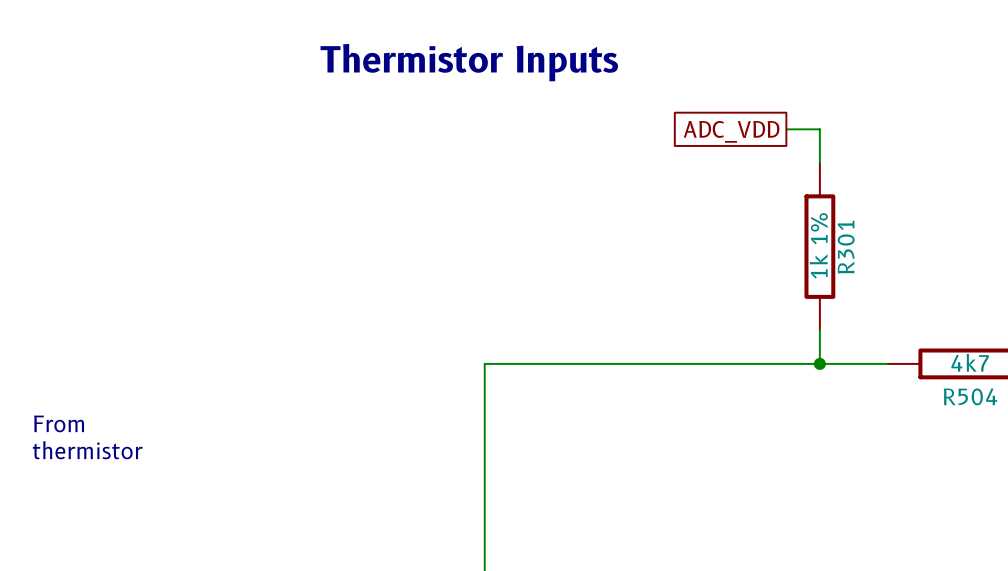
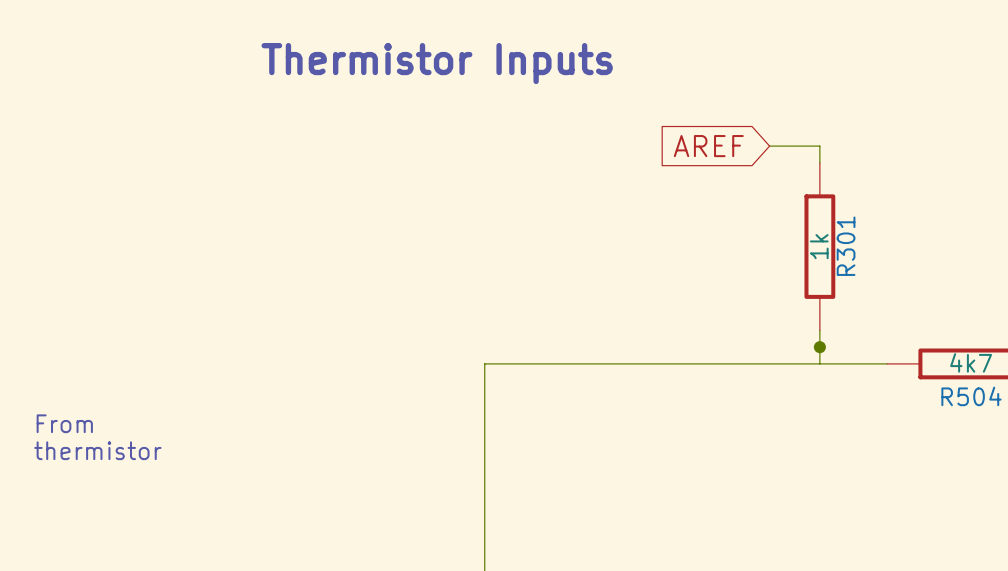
wire: (786, 129) (819, 129) (819, 146) -> (769, 146) (819, 146)
global label: ADC_VDD (731, 131) -> none
global label: none -> AREF (708, 146)
R301 value: 1k 1% (818, 245) -> 1k (819, 246)
junction position: (819, 363) -> (819, 347)

